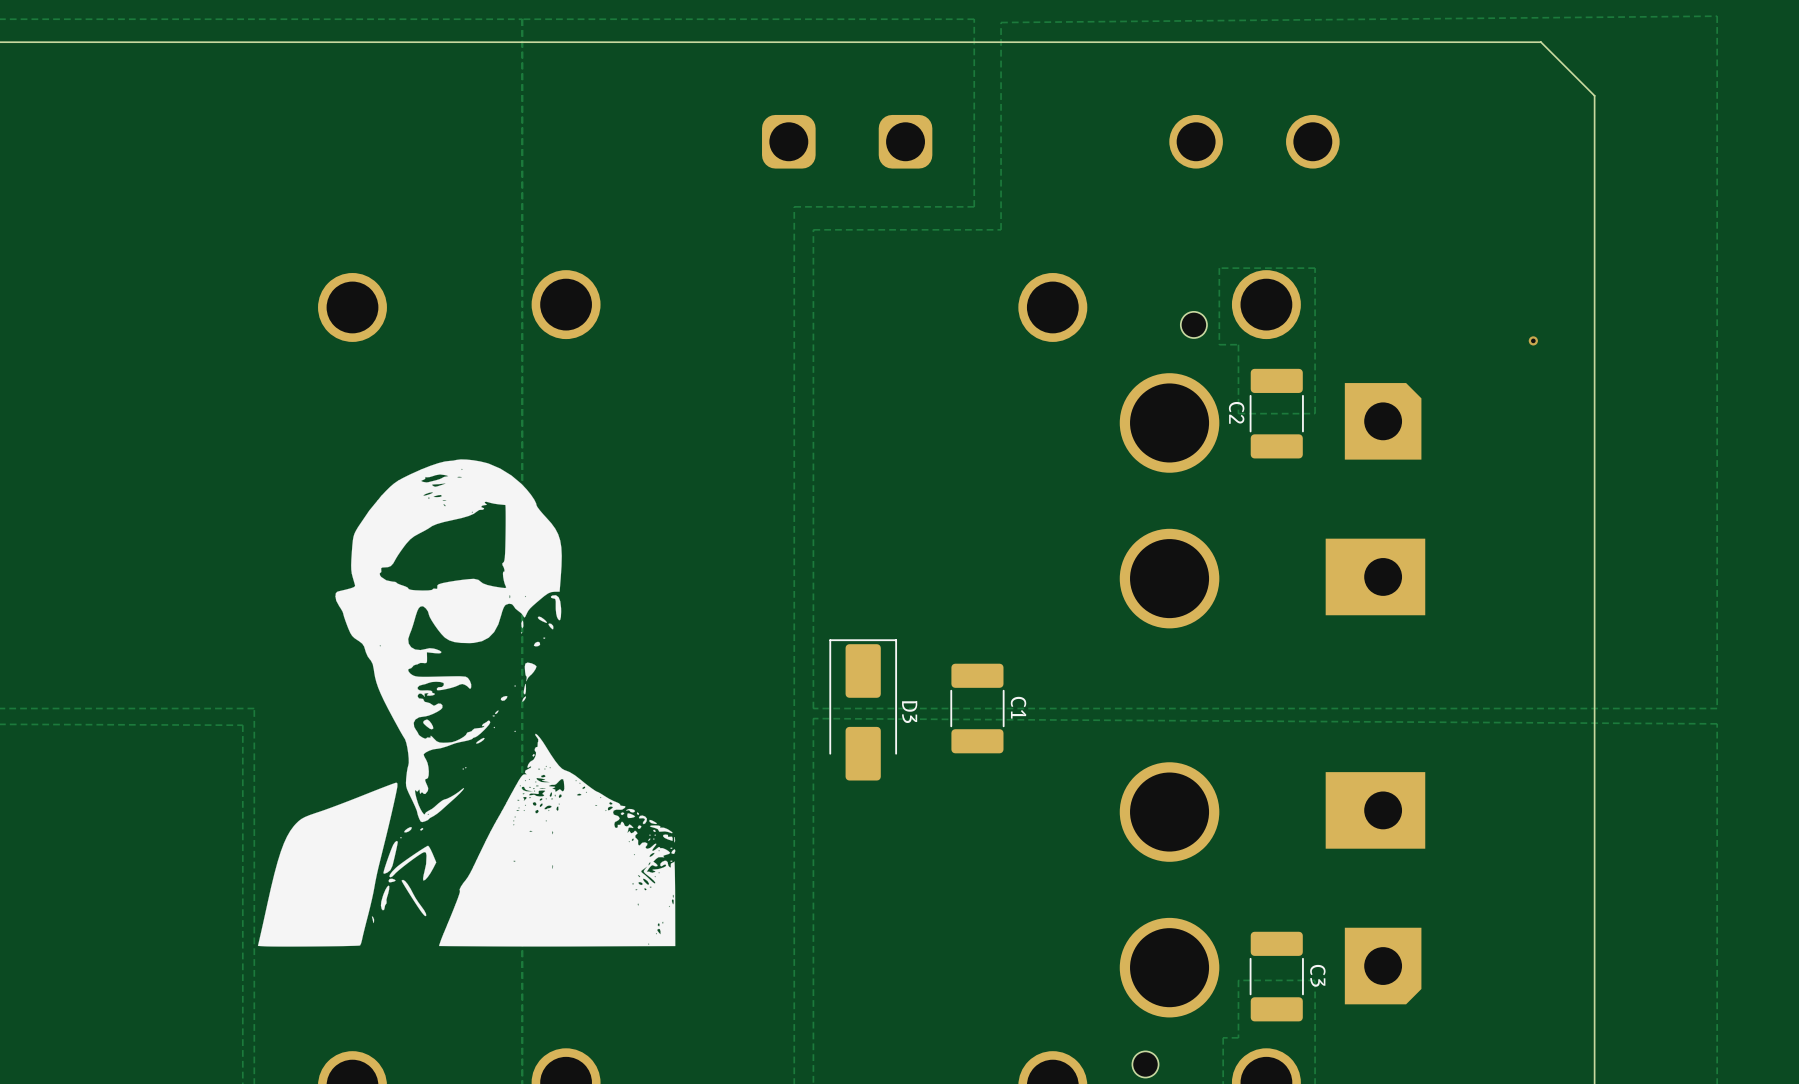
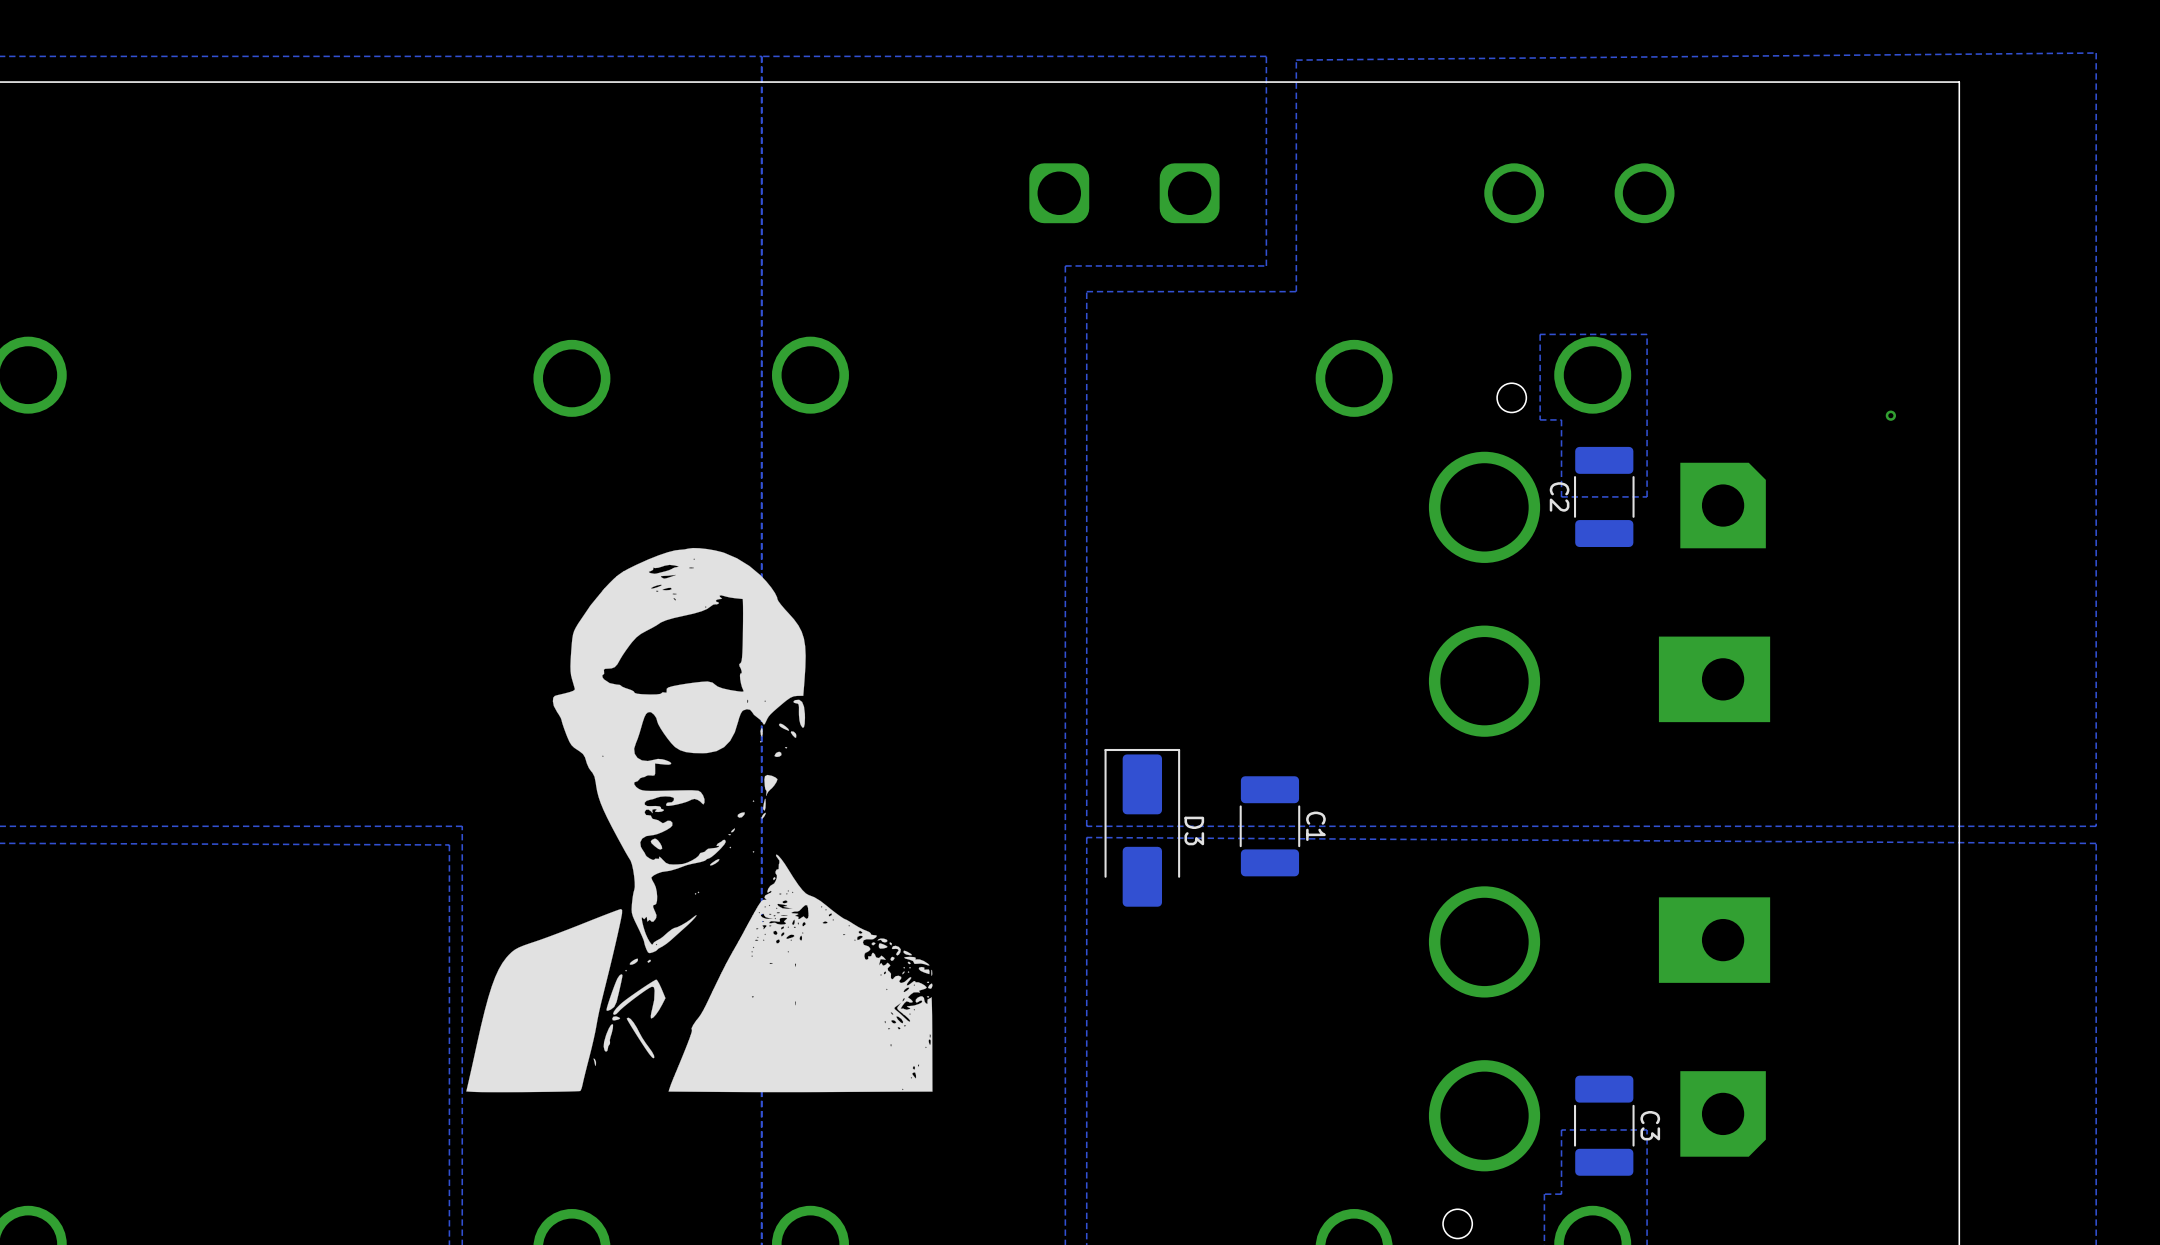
board edge: (1541, 42) (1594, 95) -> (1899, 82) (1959, 82) (1959, 141)

